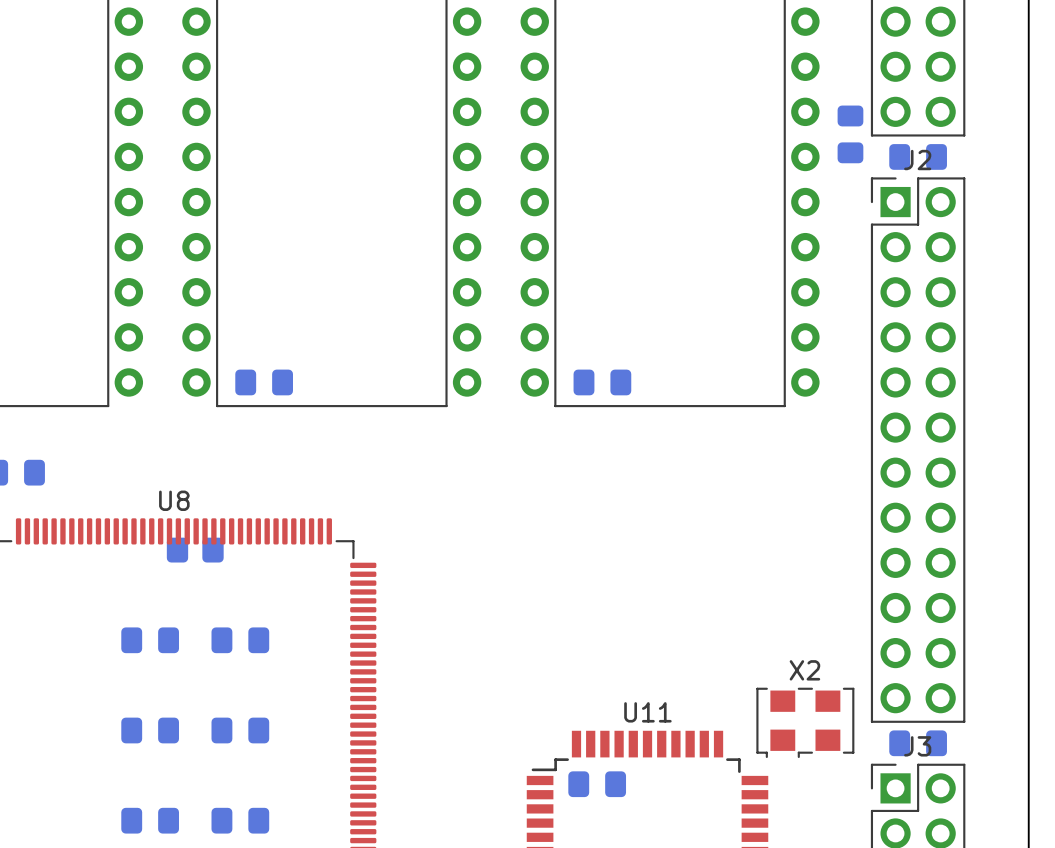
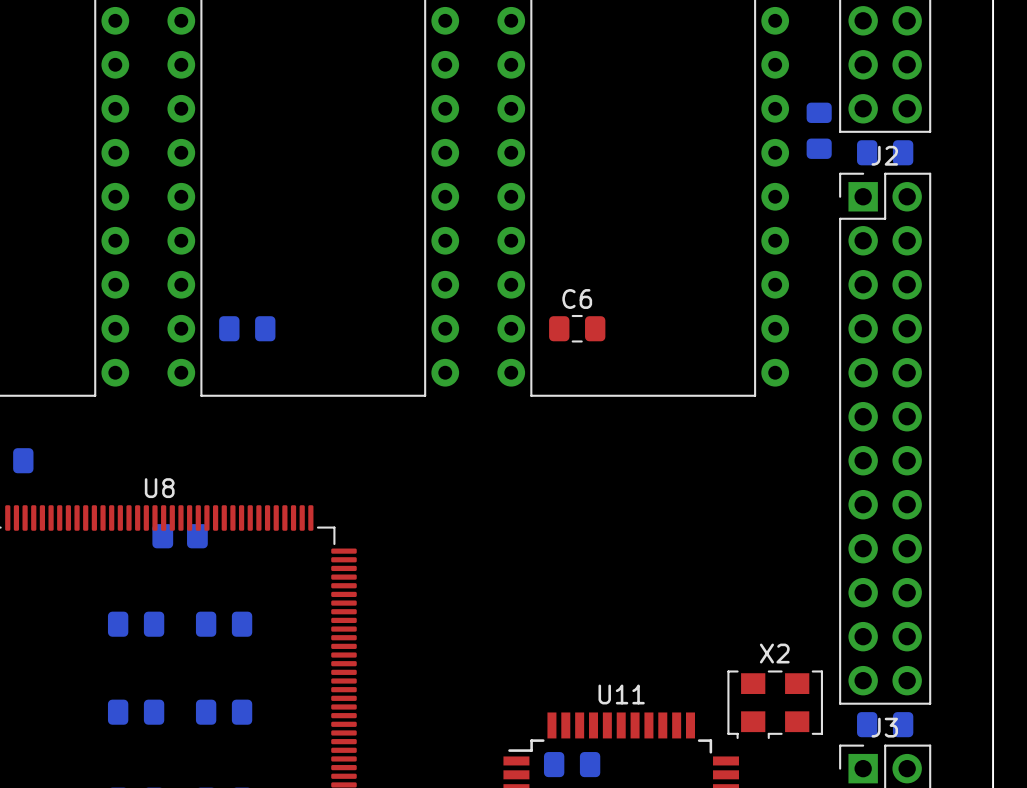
part position: (264, 382) -> (247, 328)
C6 side: bottom (602, 382) -> top (577, 328)

